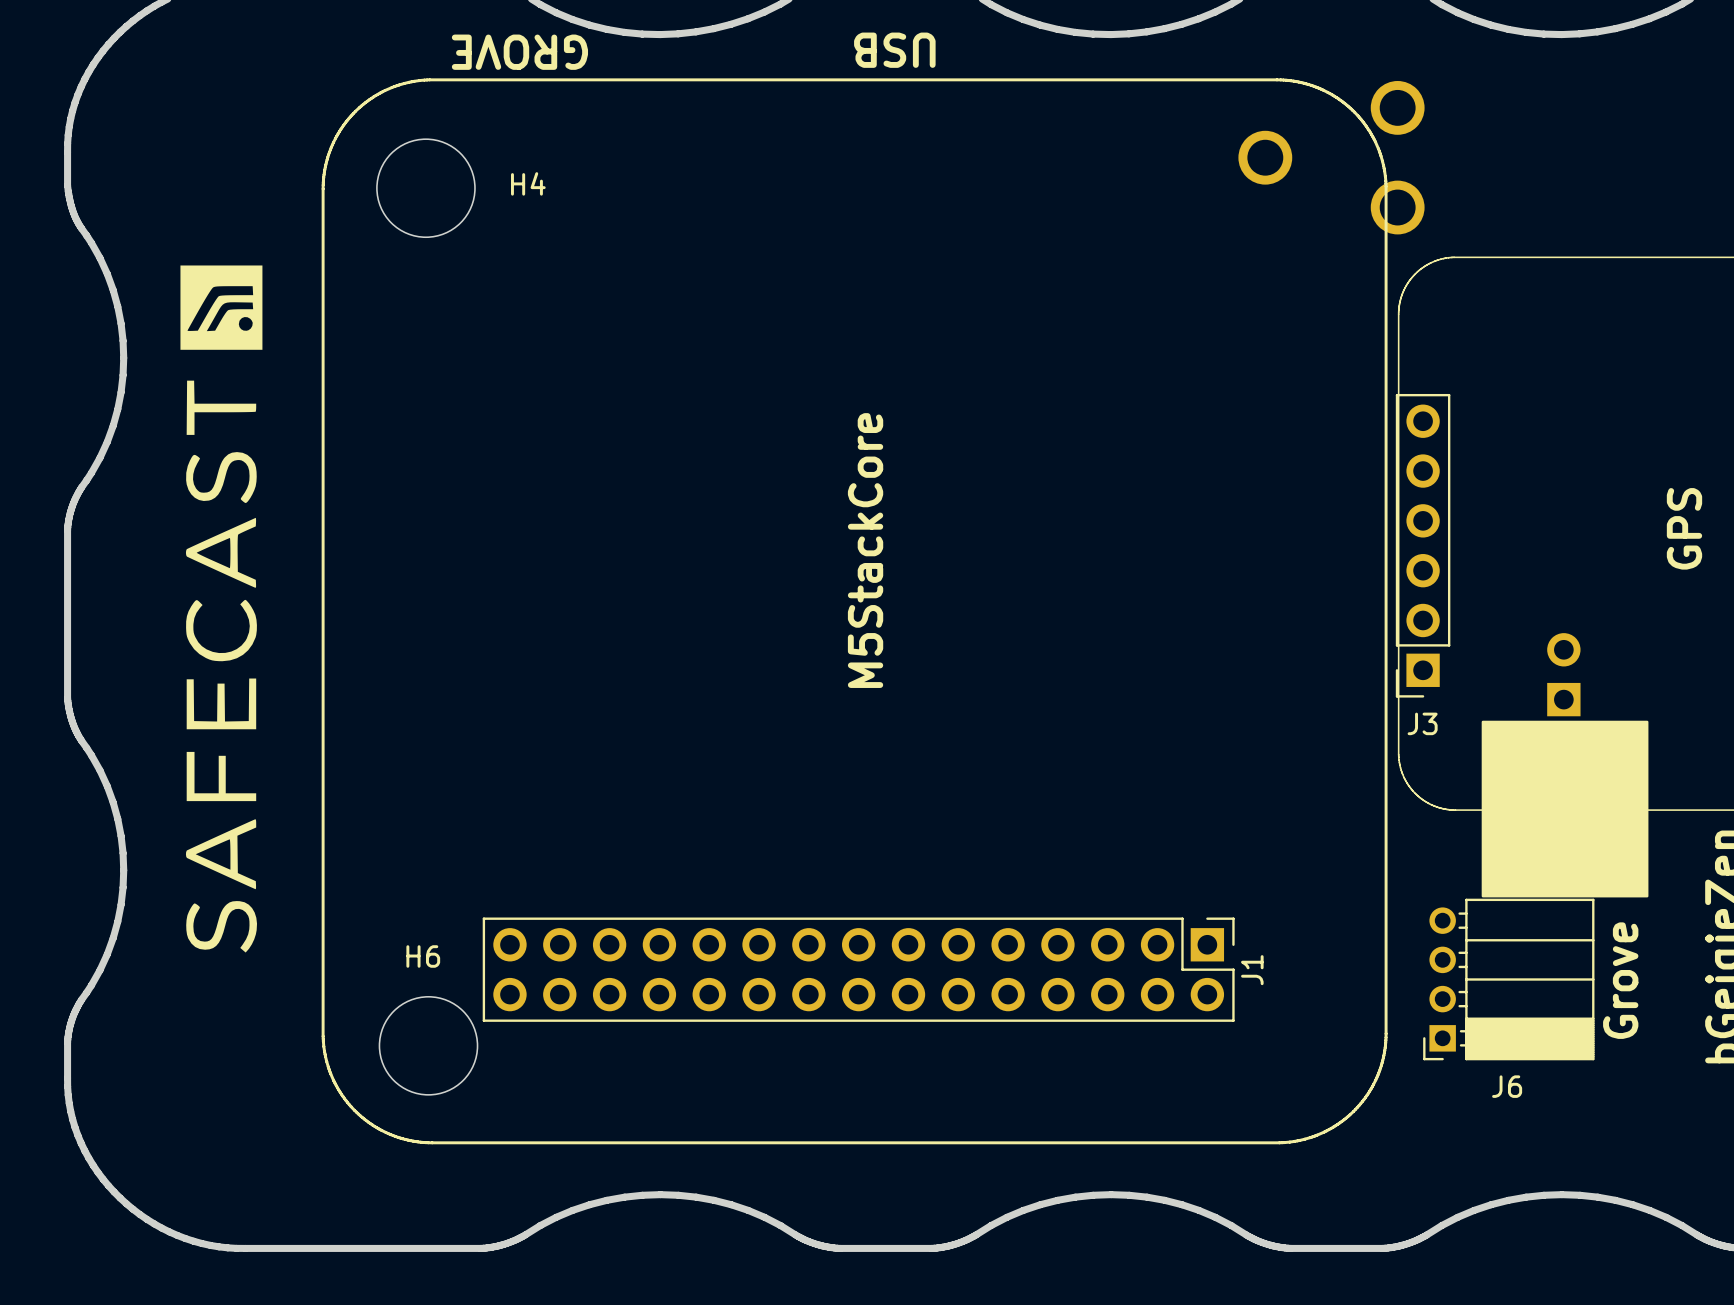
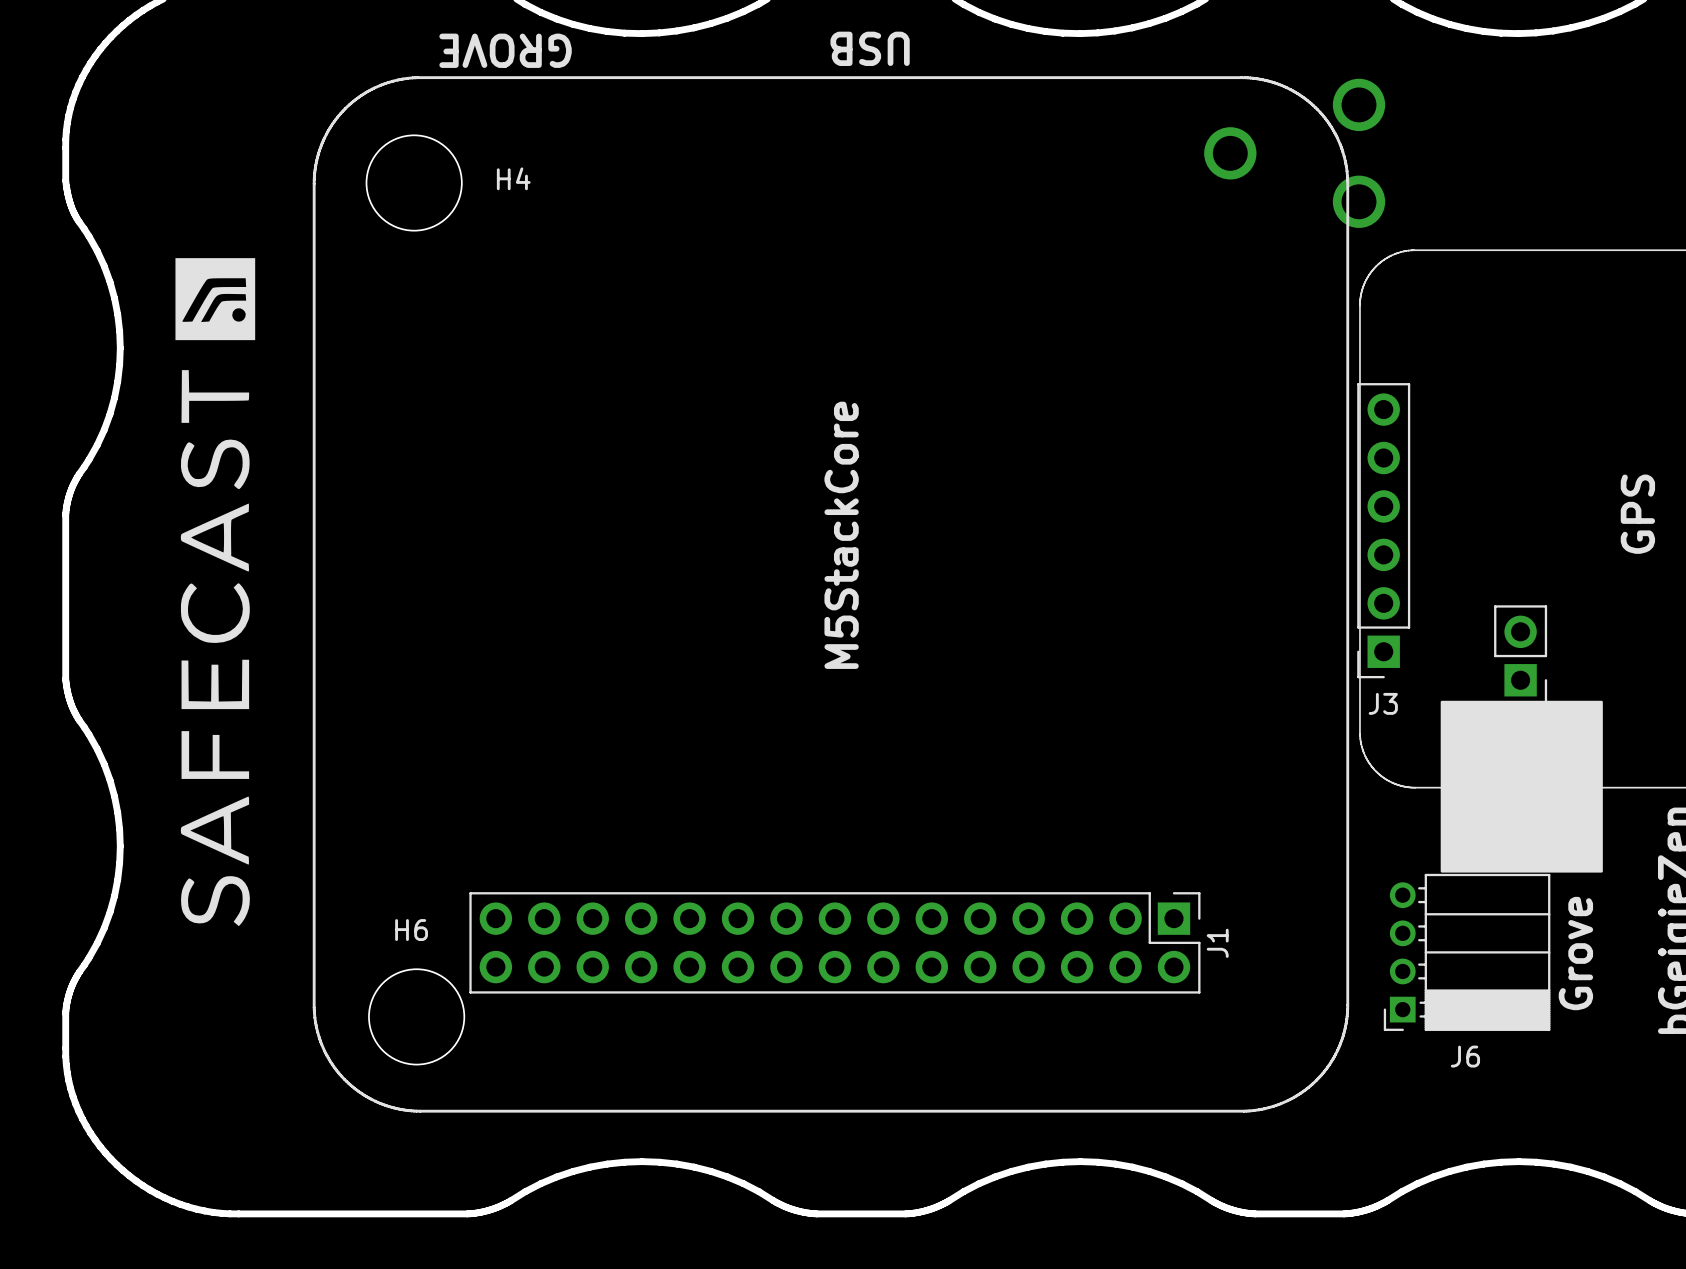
part footprint: [1547, 633, 1581, 717] -> [1494, 605, 1548, 707]

